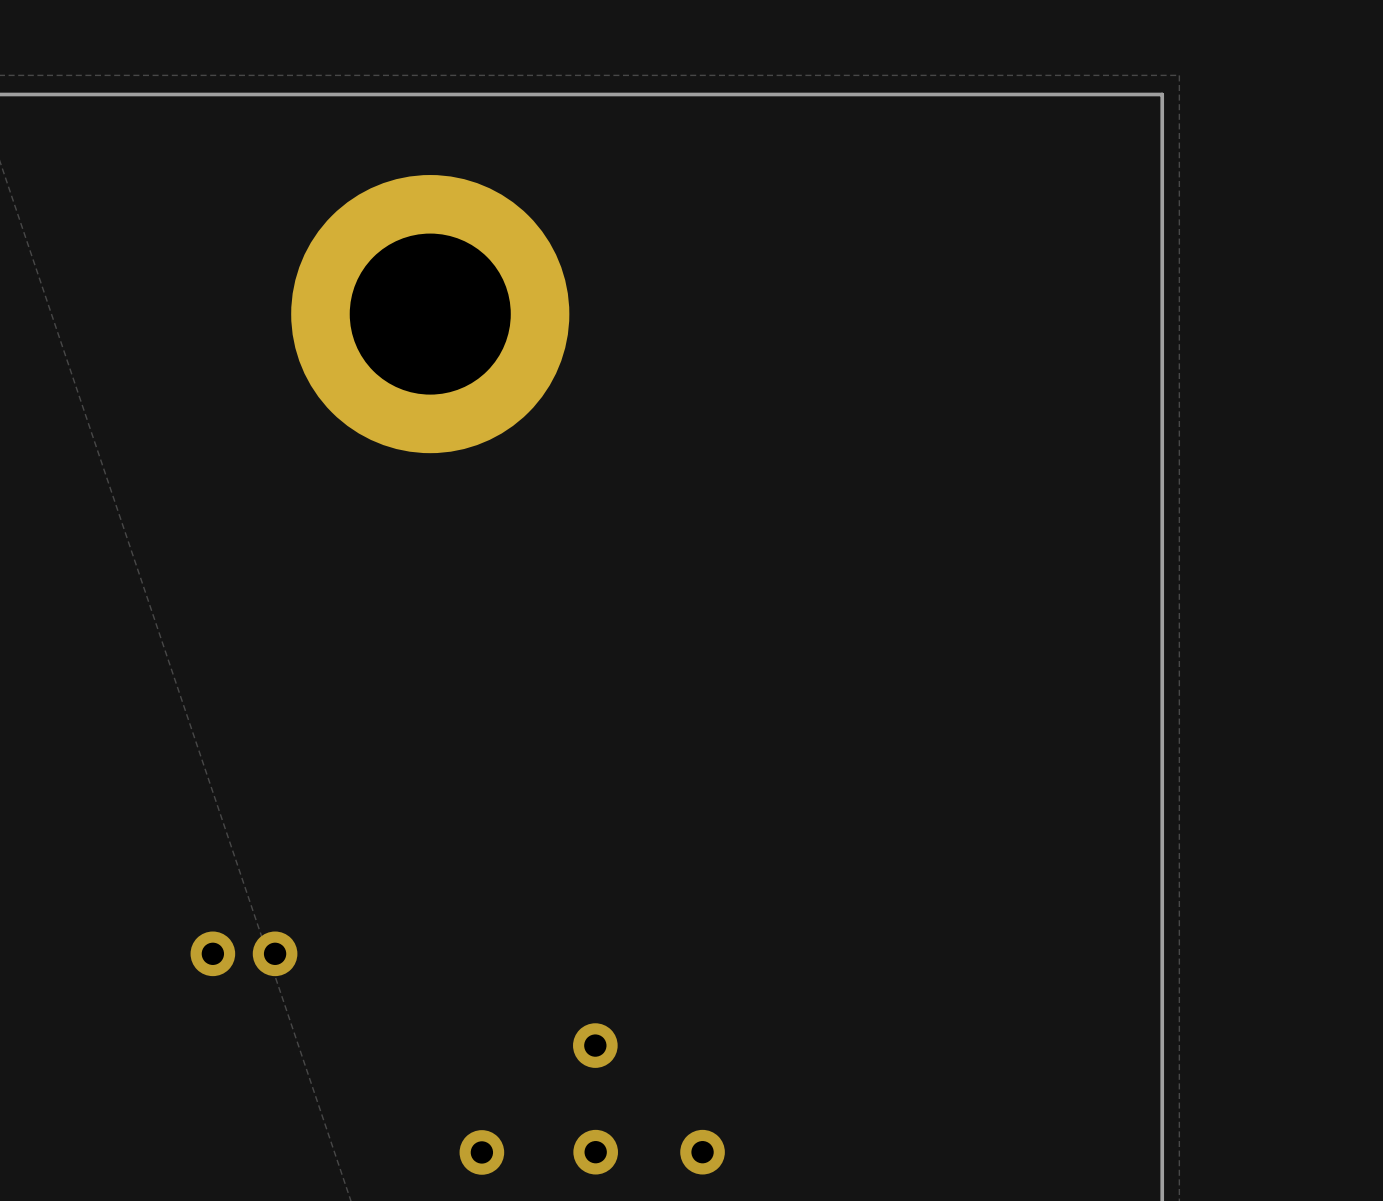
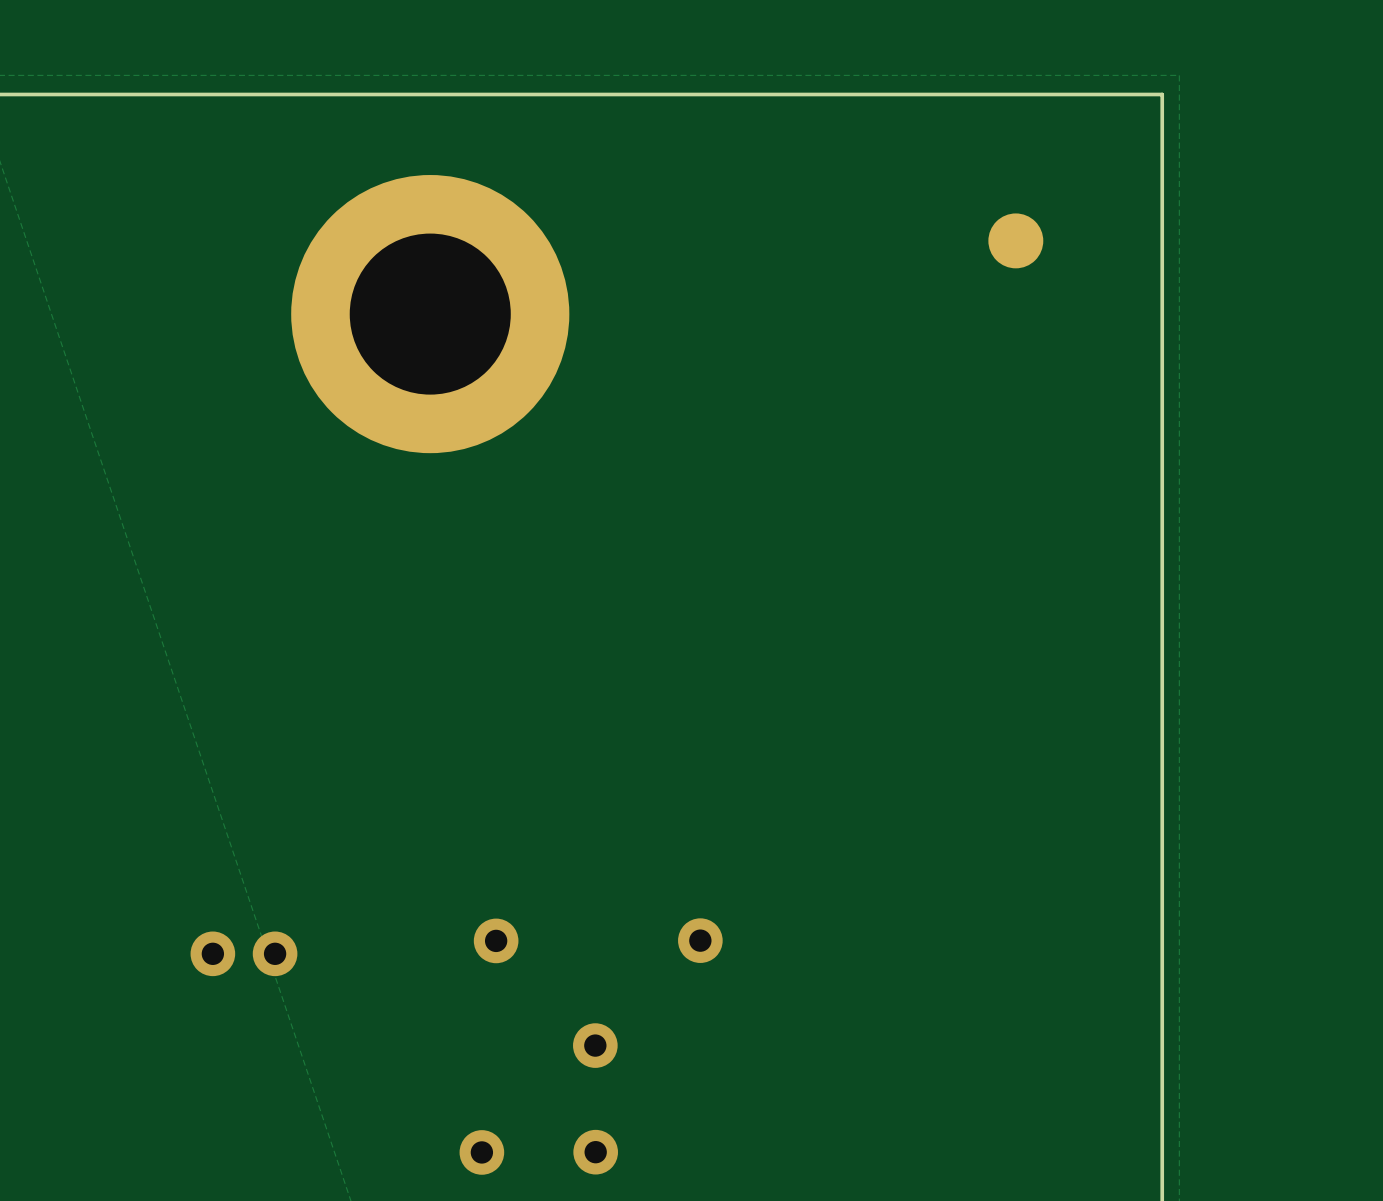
part: none -> (1015, 240)
via: none -> (496, 940)
via: none -> (700, 940)
via: (702, 1152) -> none

